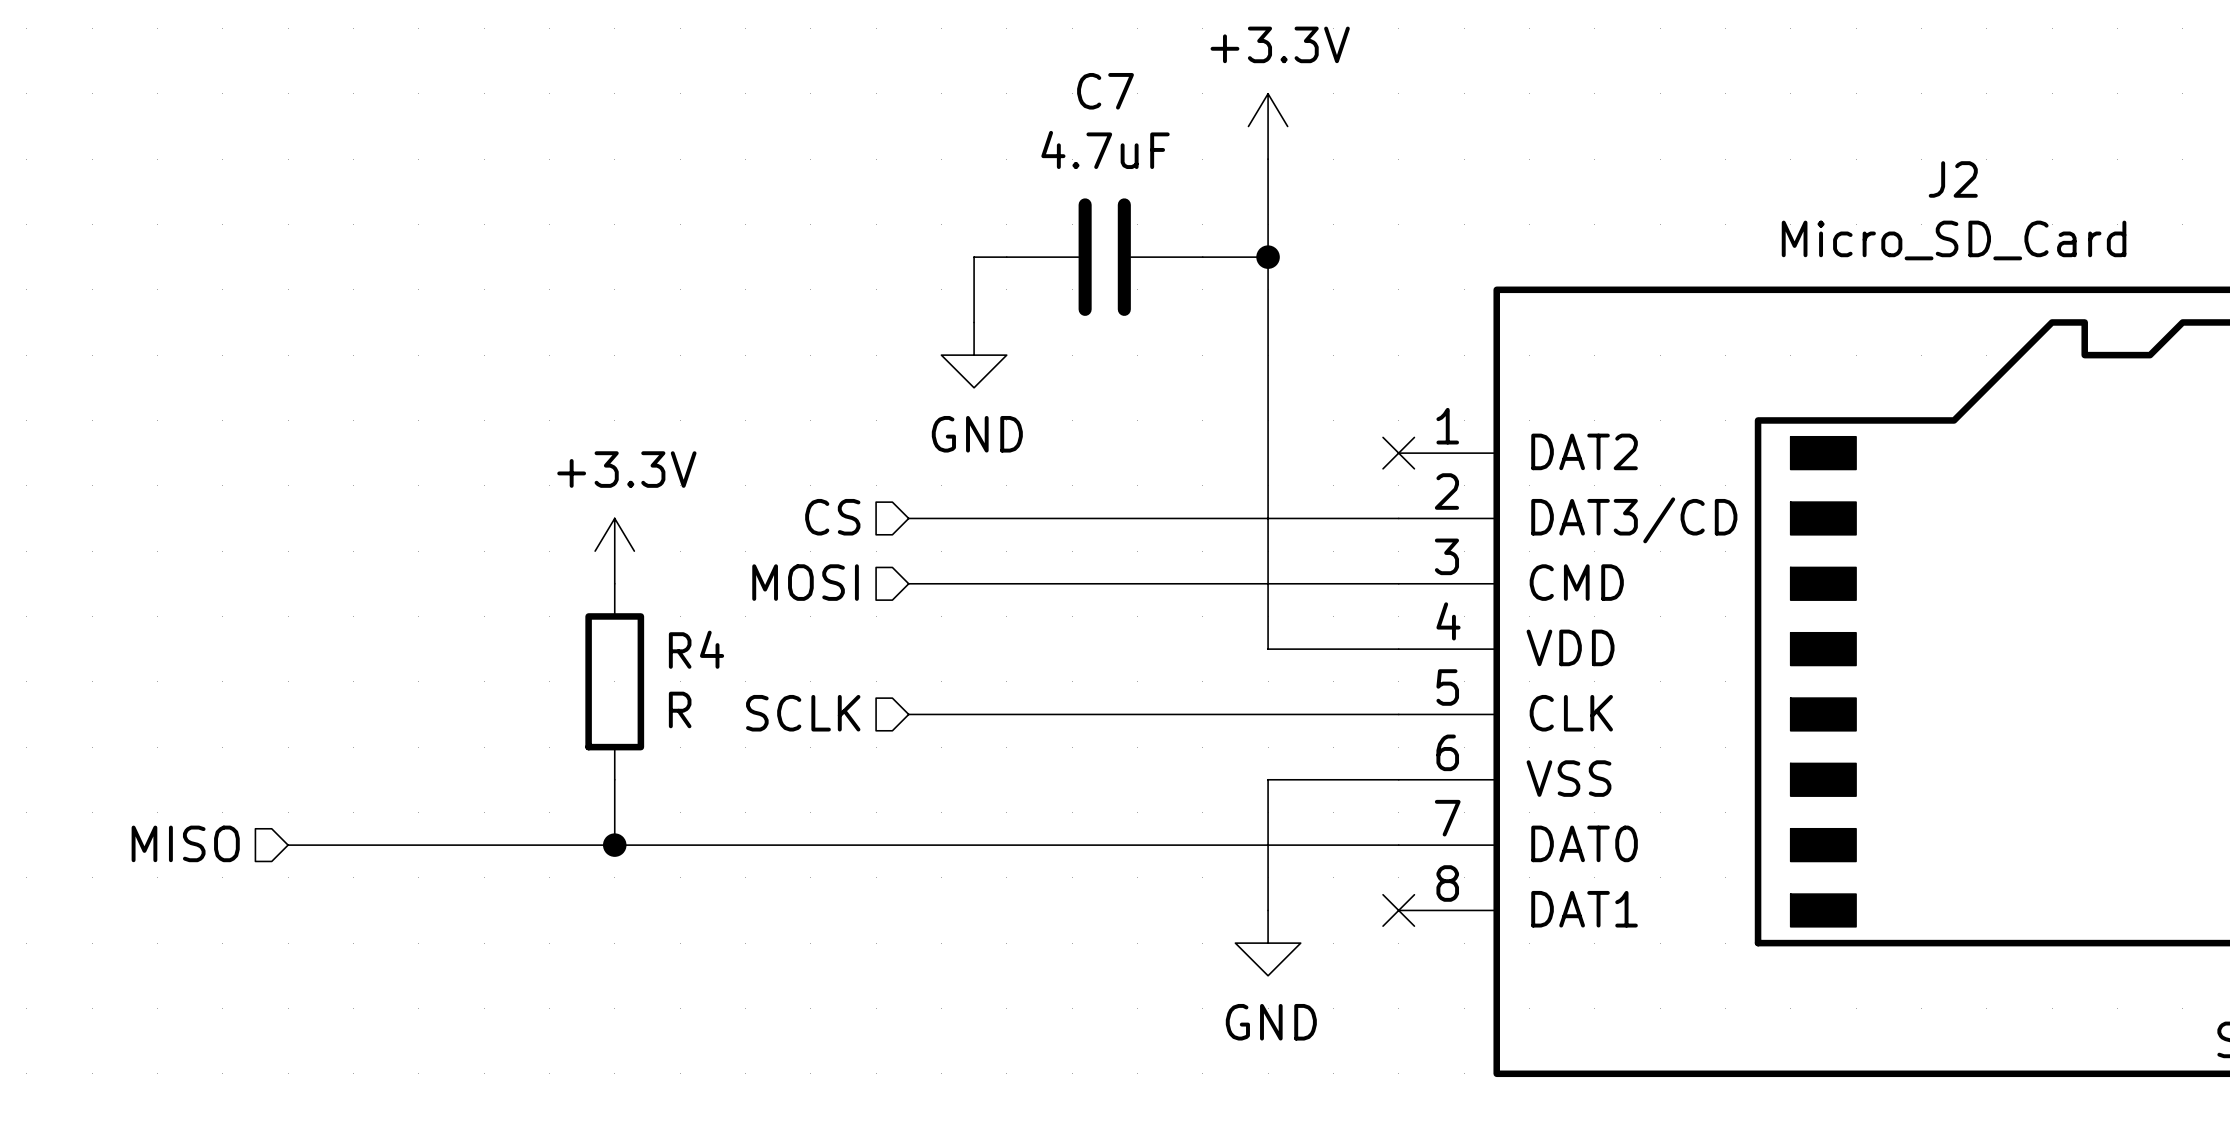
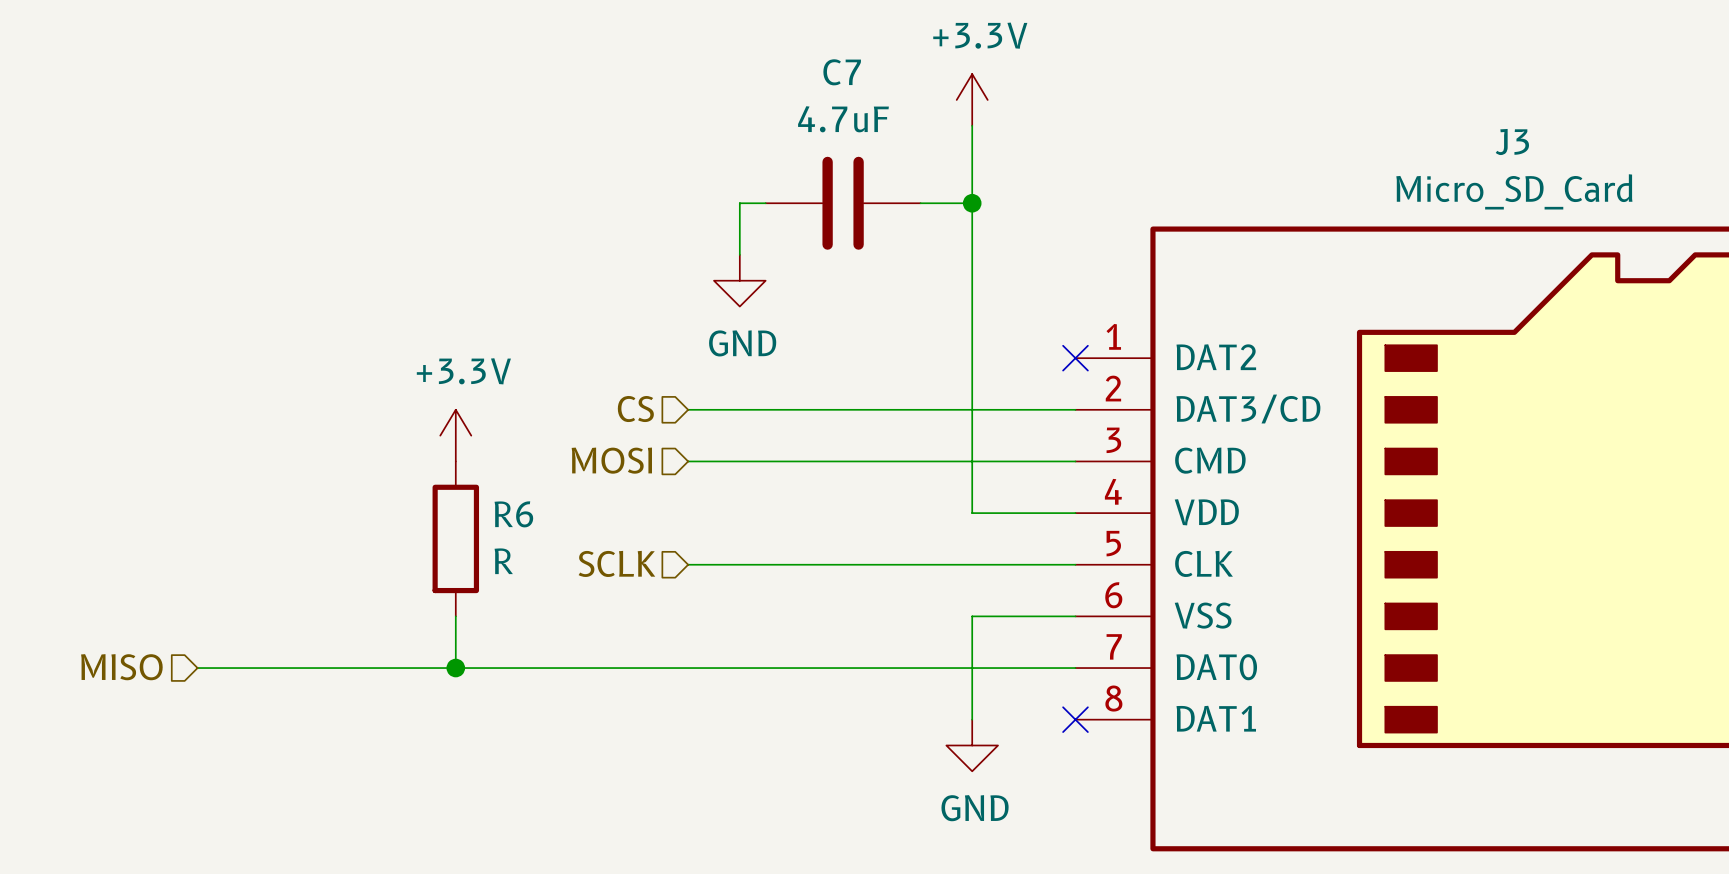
J2 name: J2 (1953, 179) -> J3 (1512, 142)
R4 name: R4 (696, 649) -> R6 (513, 514)

